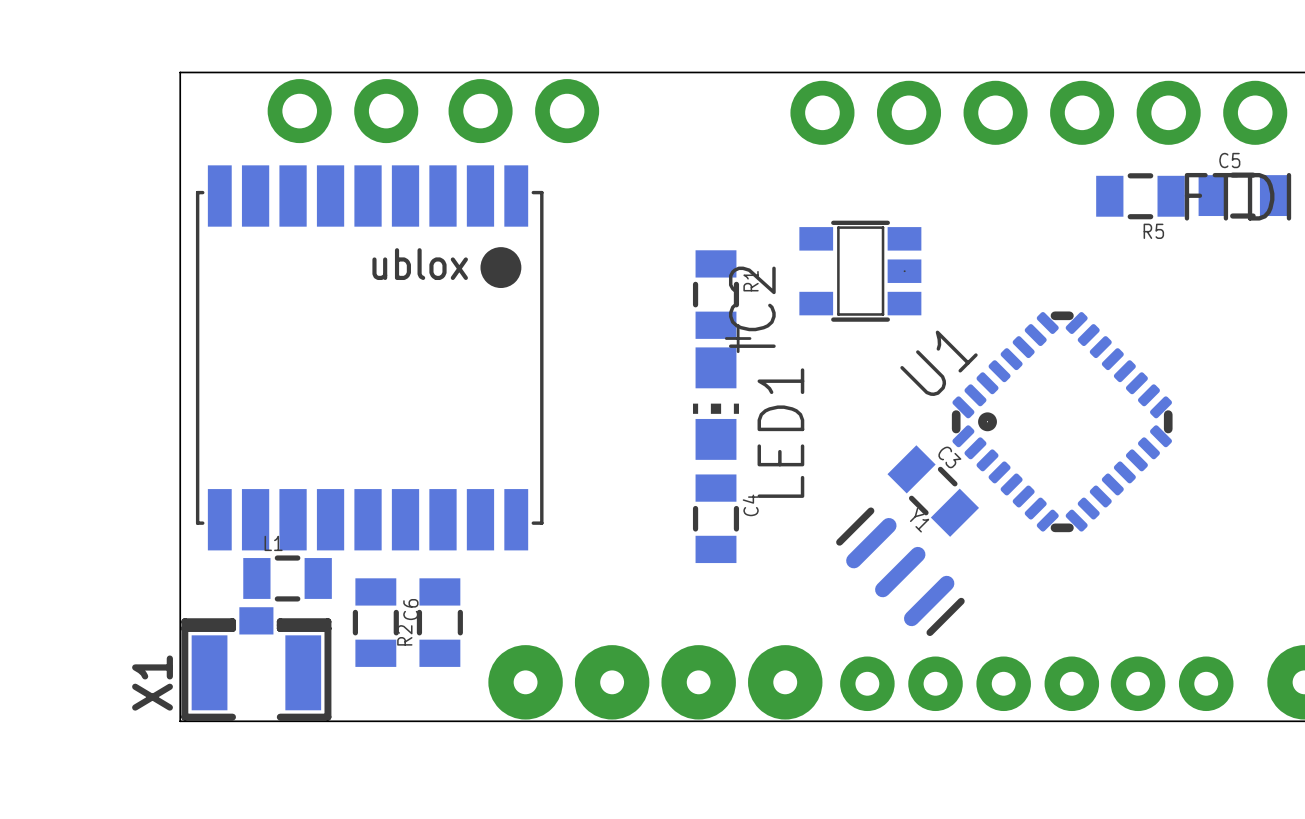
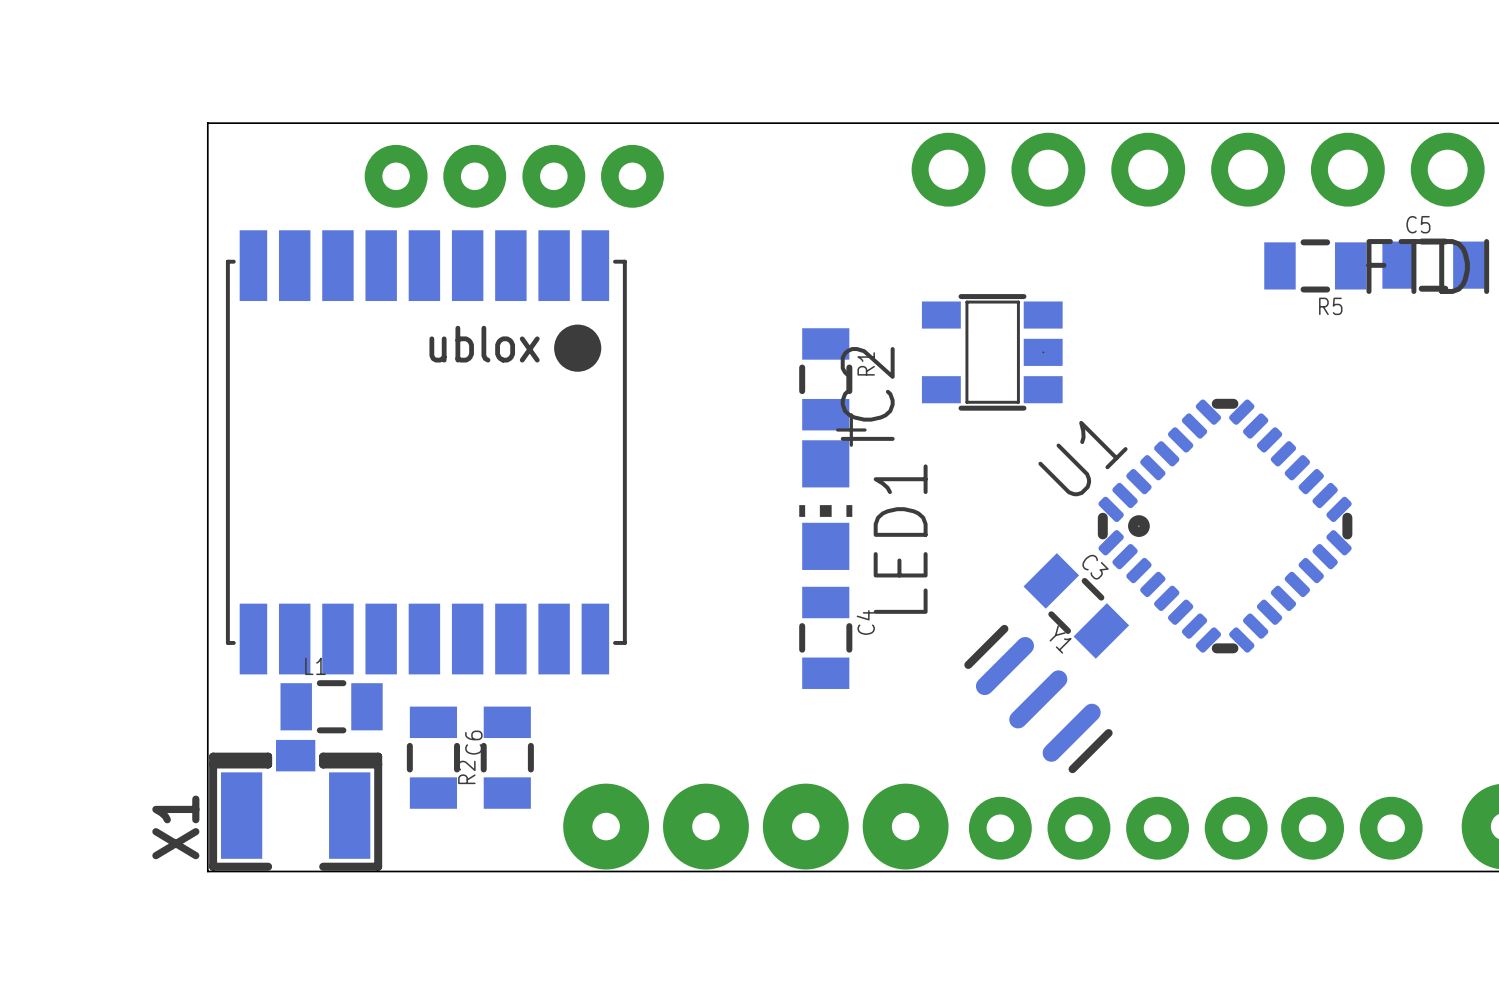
part footprint: [448, 79, 600, 144] -> [522, 144, 664, 208]
part: (342, 111) -> none
part: none -> (435, 176)

